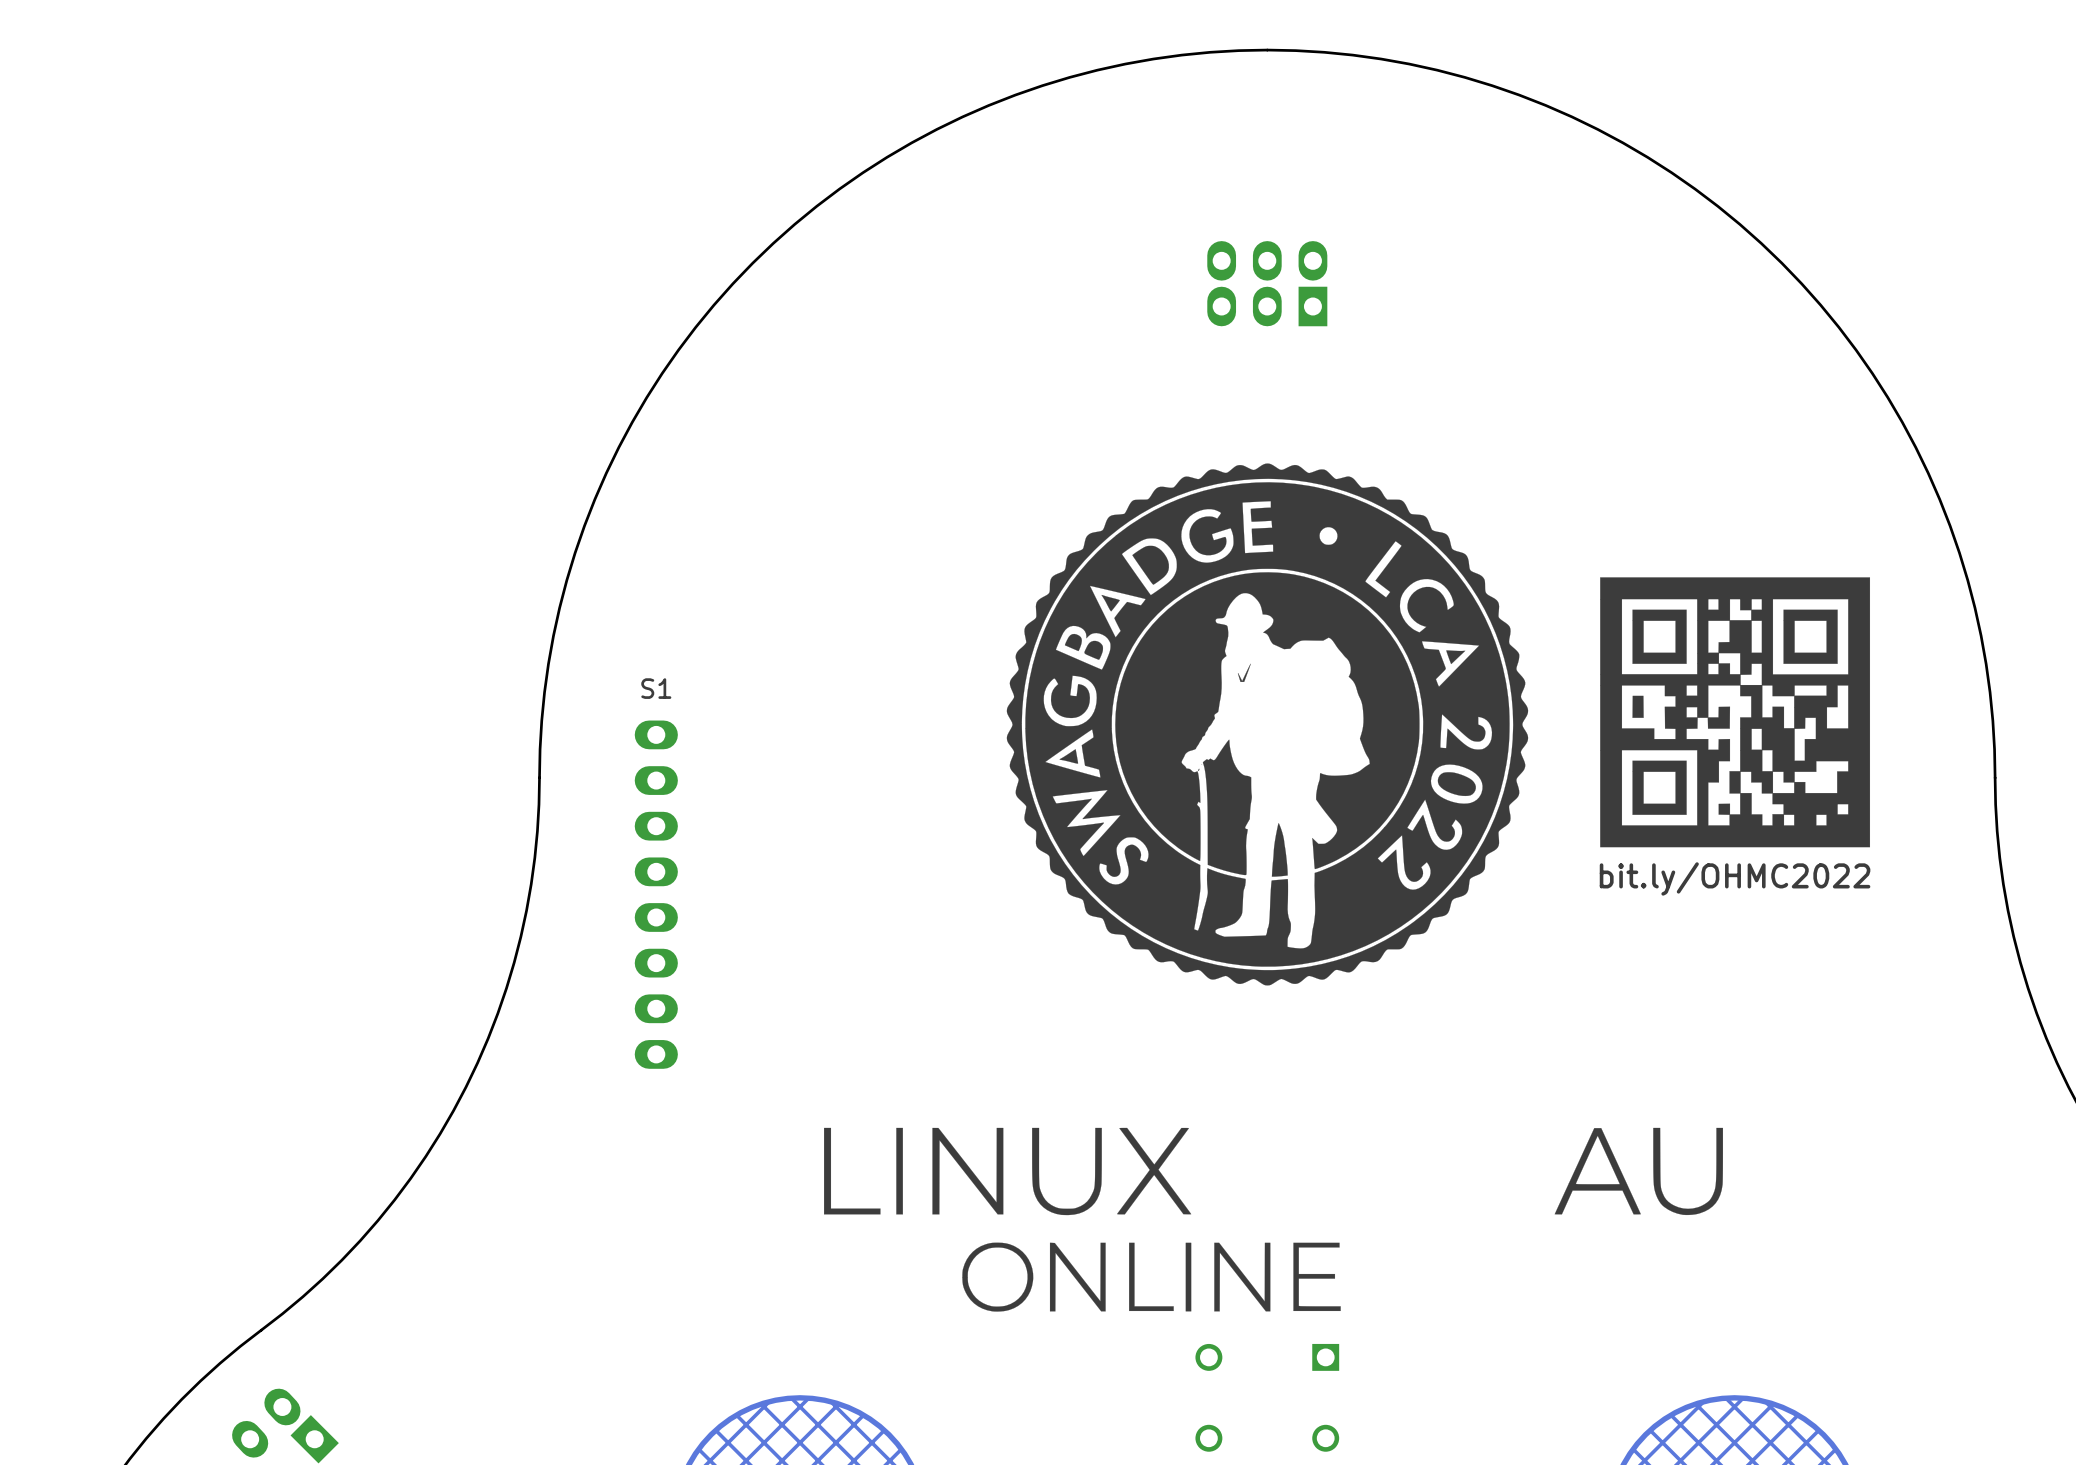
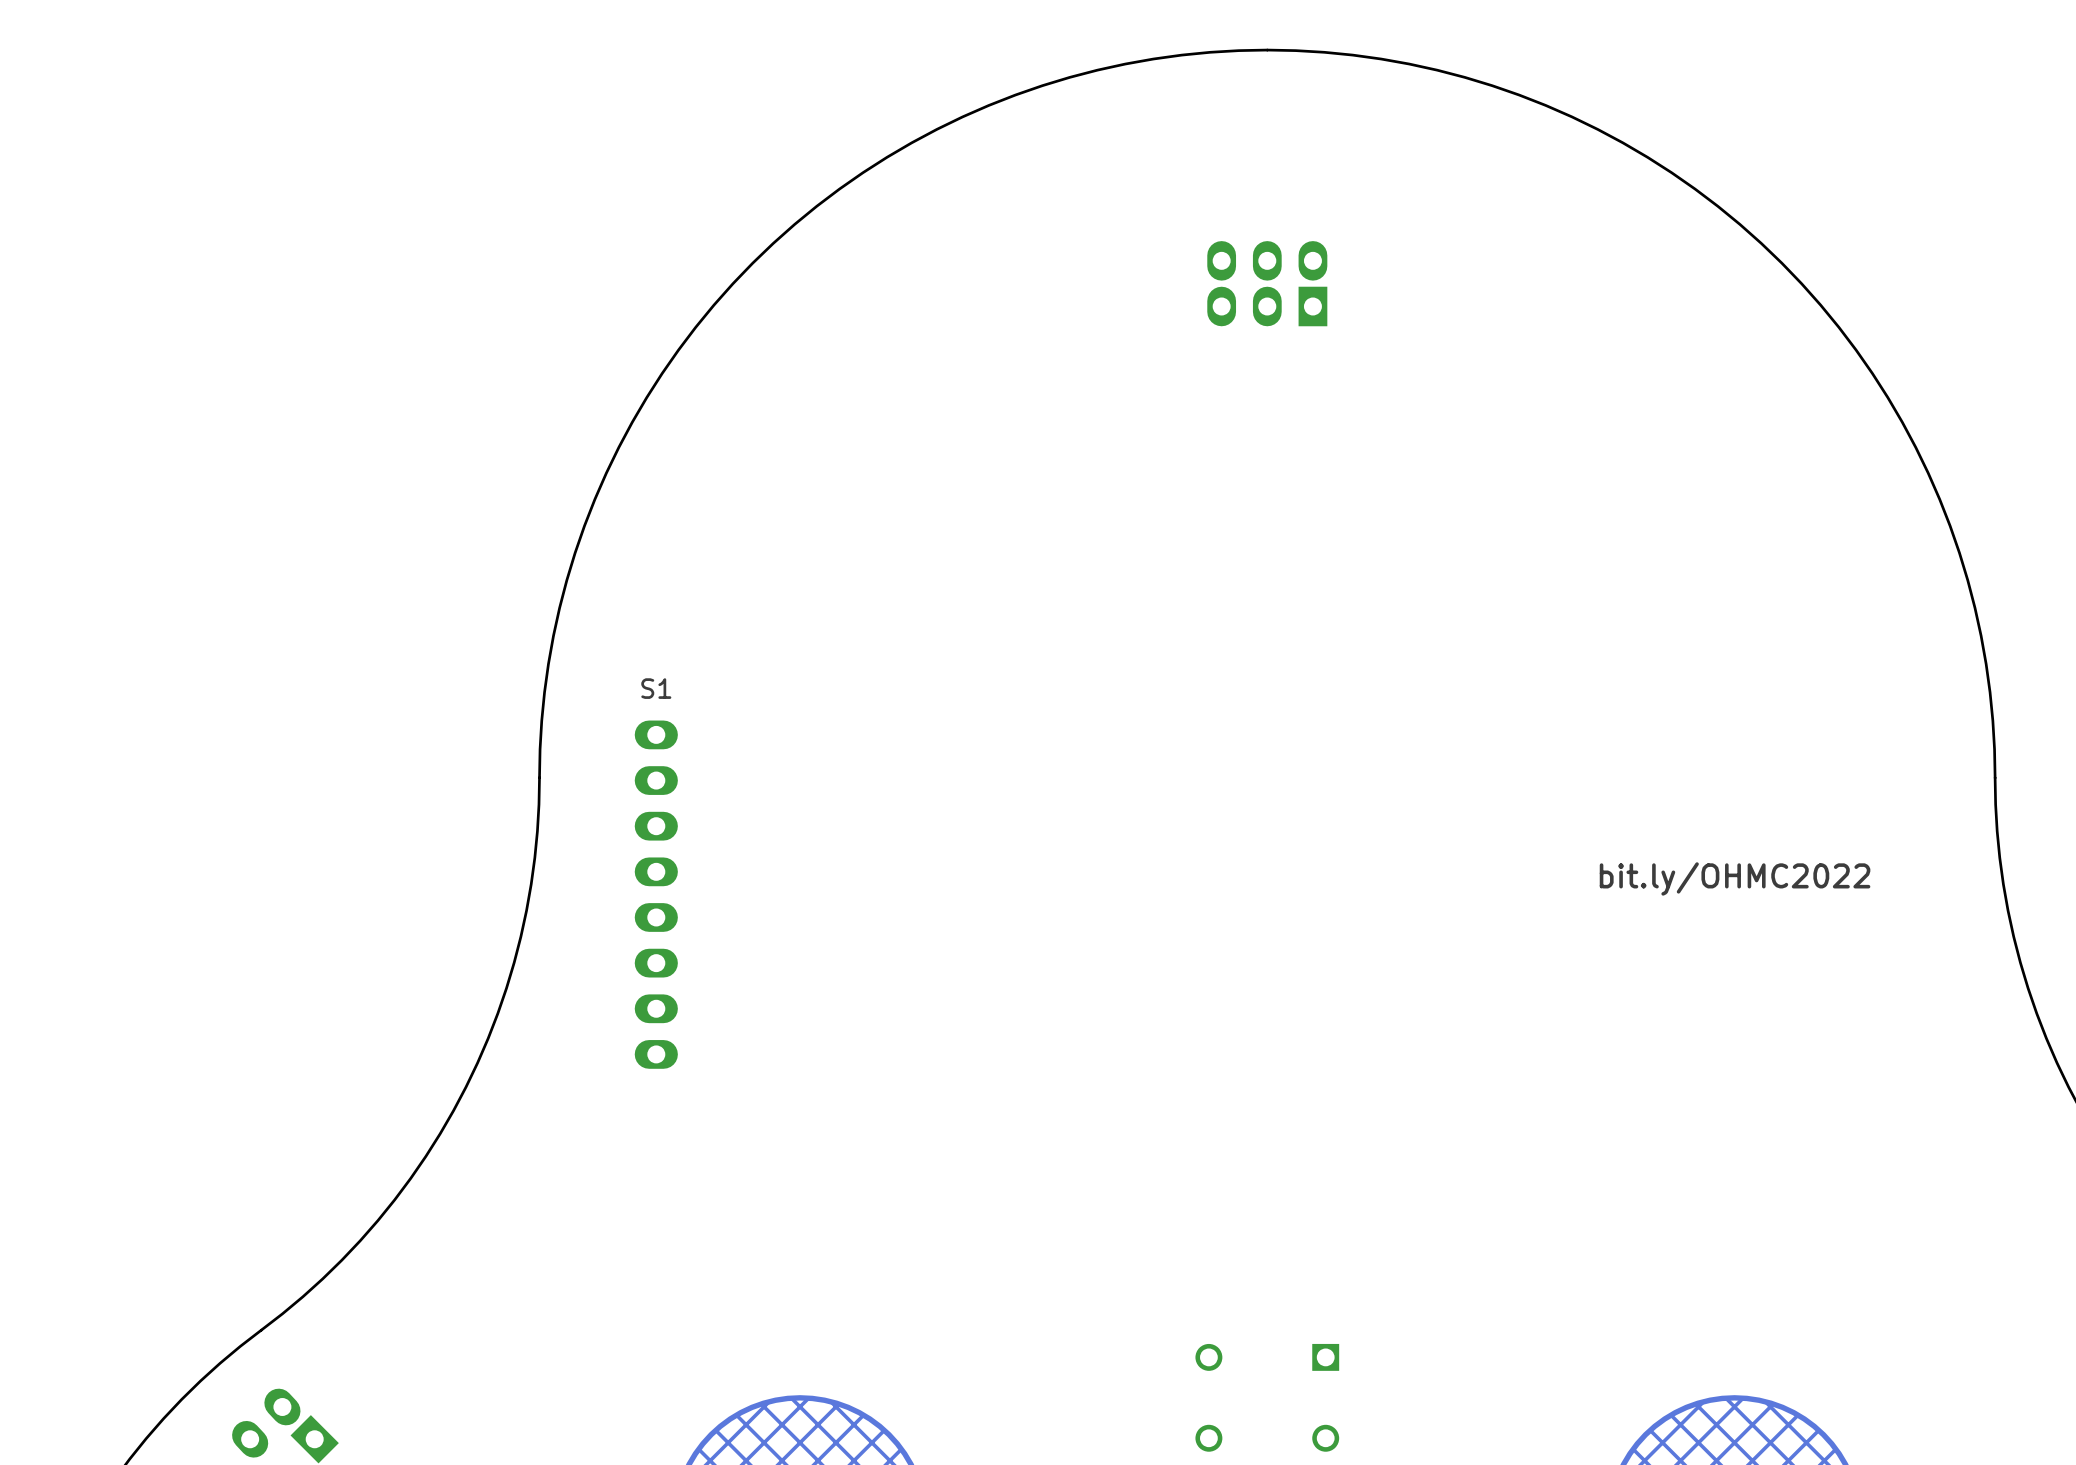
drawing: [1006, 463, 1529, 986] -> none
drawing: [1600, 577, 1871, 848] -> none
drawing: [824, 1127, 1724, 1312] -> none

